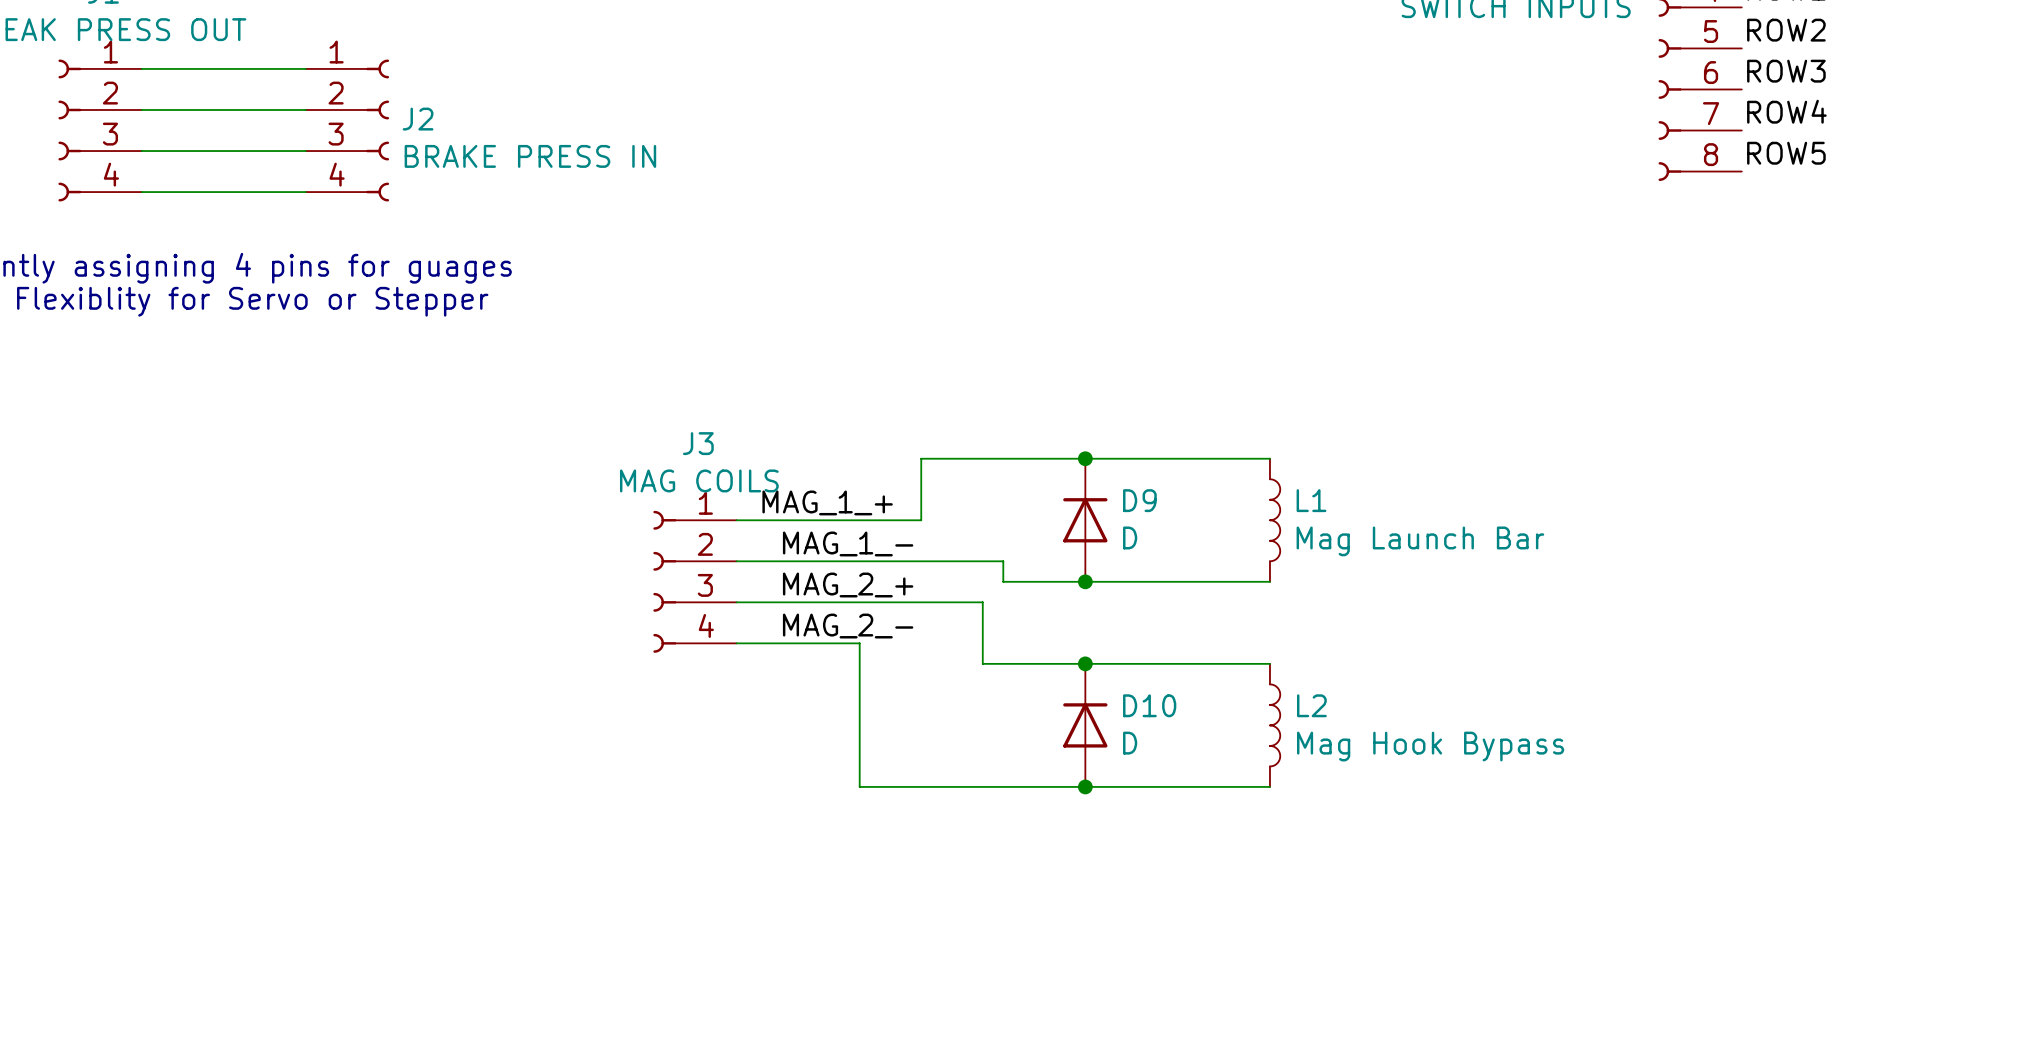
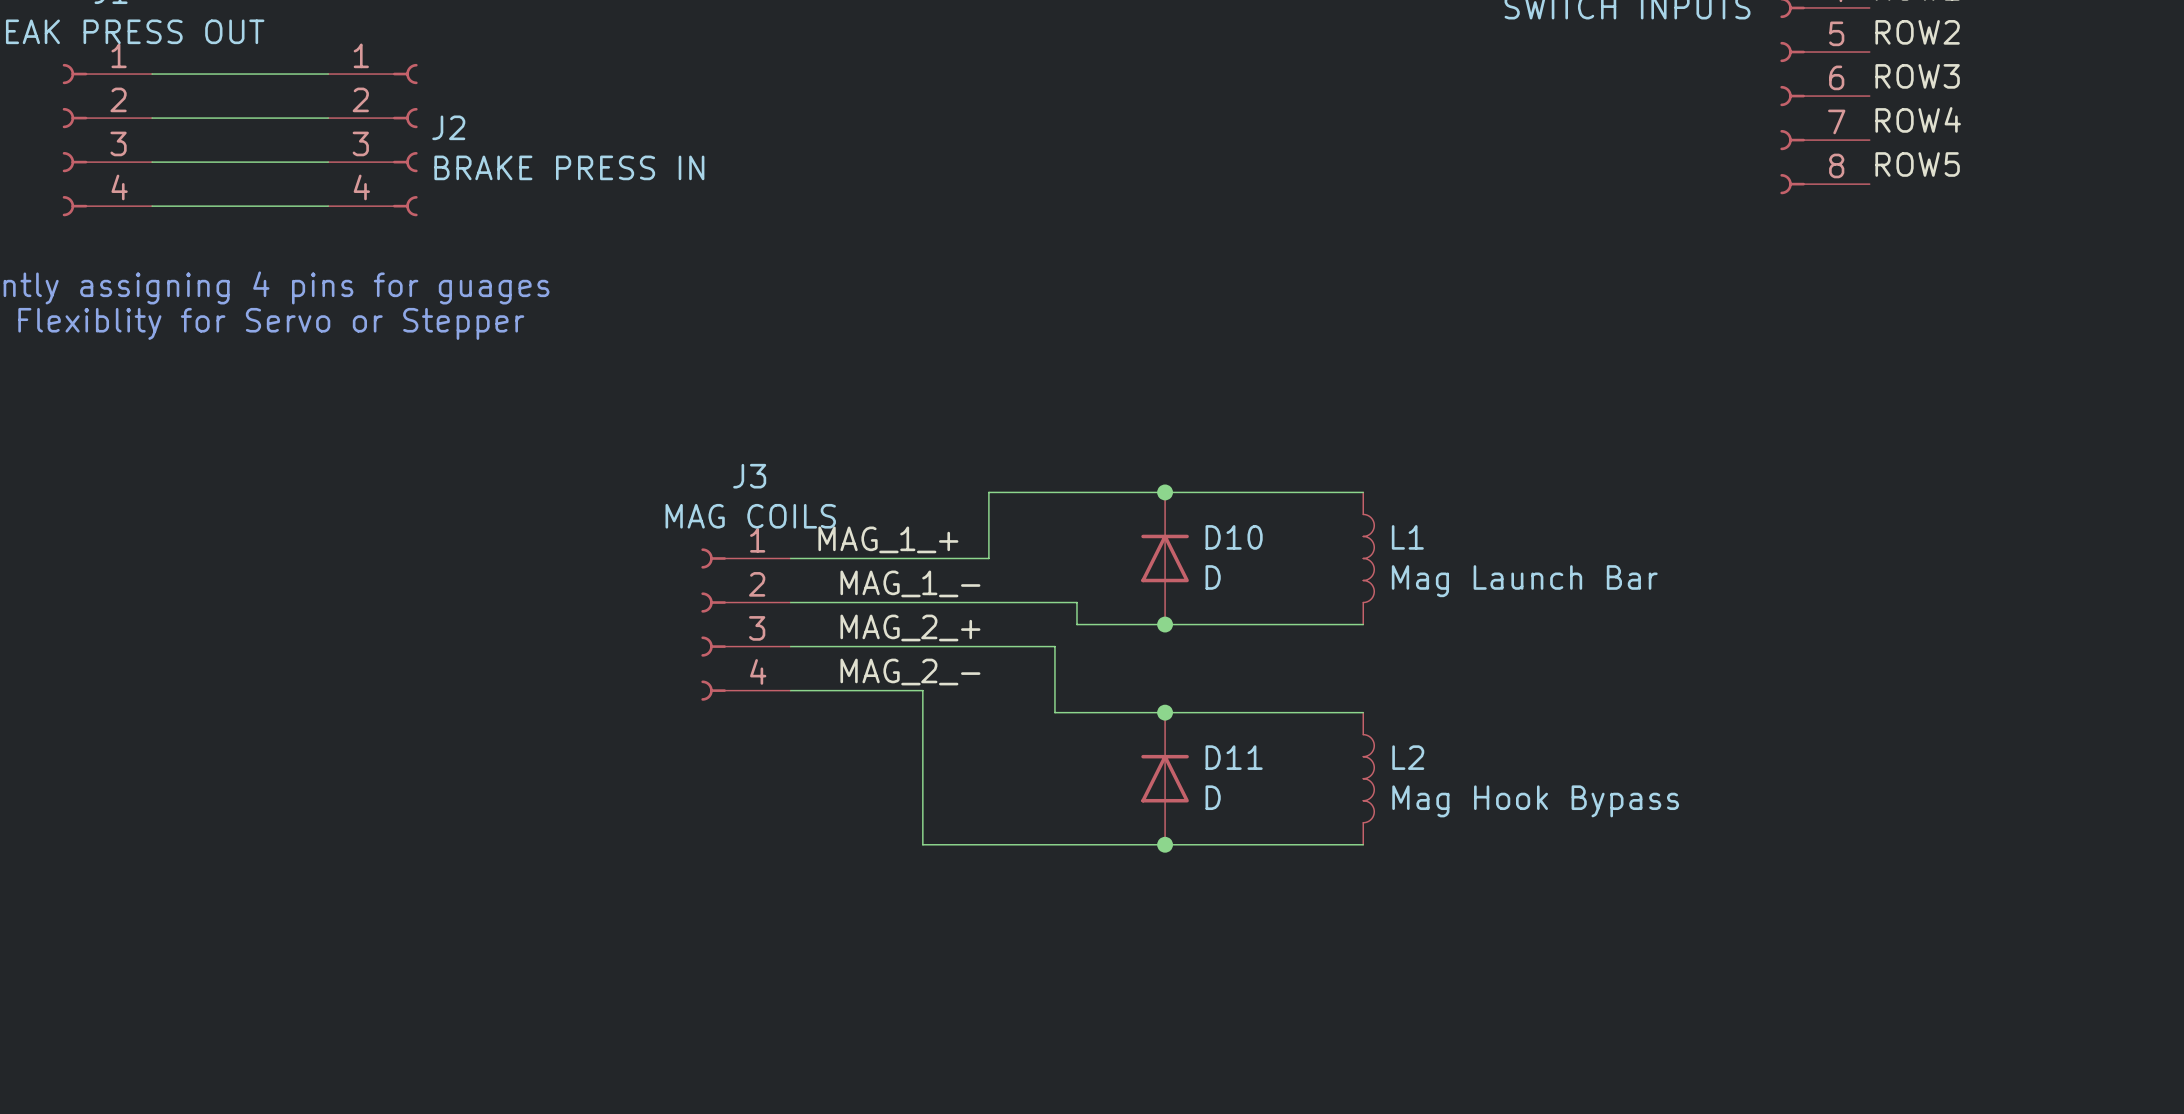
D9 name: D9 (1139, 500) -> D10 (1234, 537)
D10 name: D10 (1149, 705) -> D11 (1234, 757)

